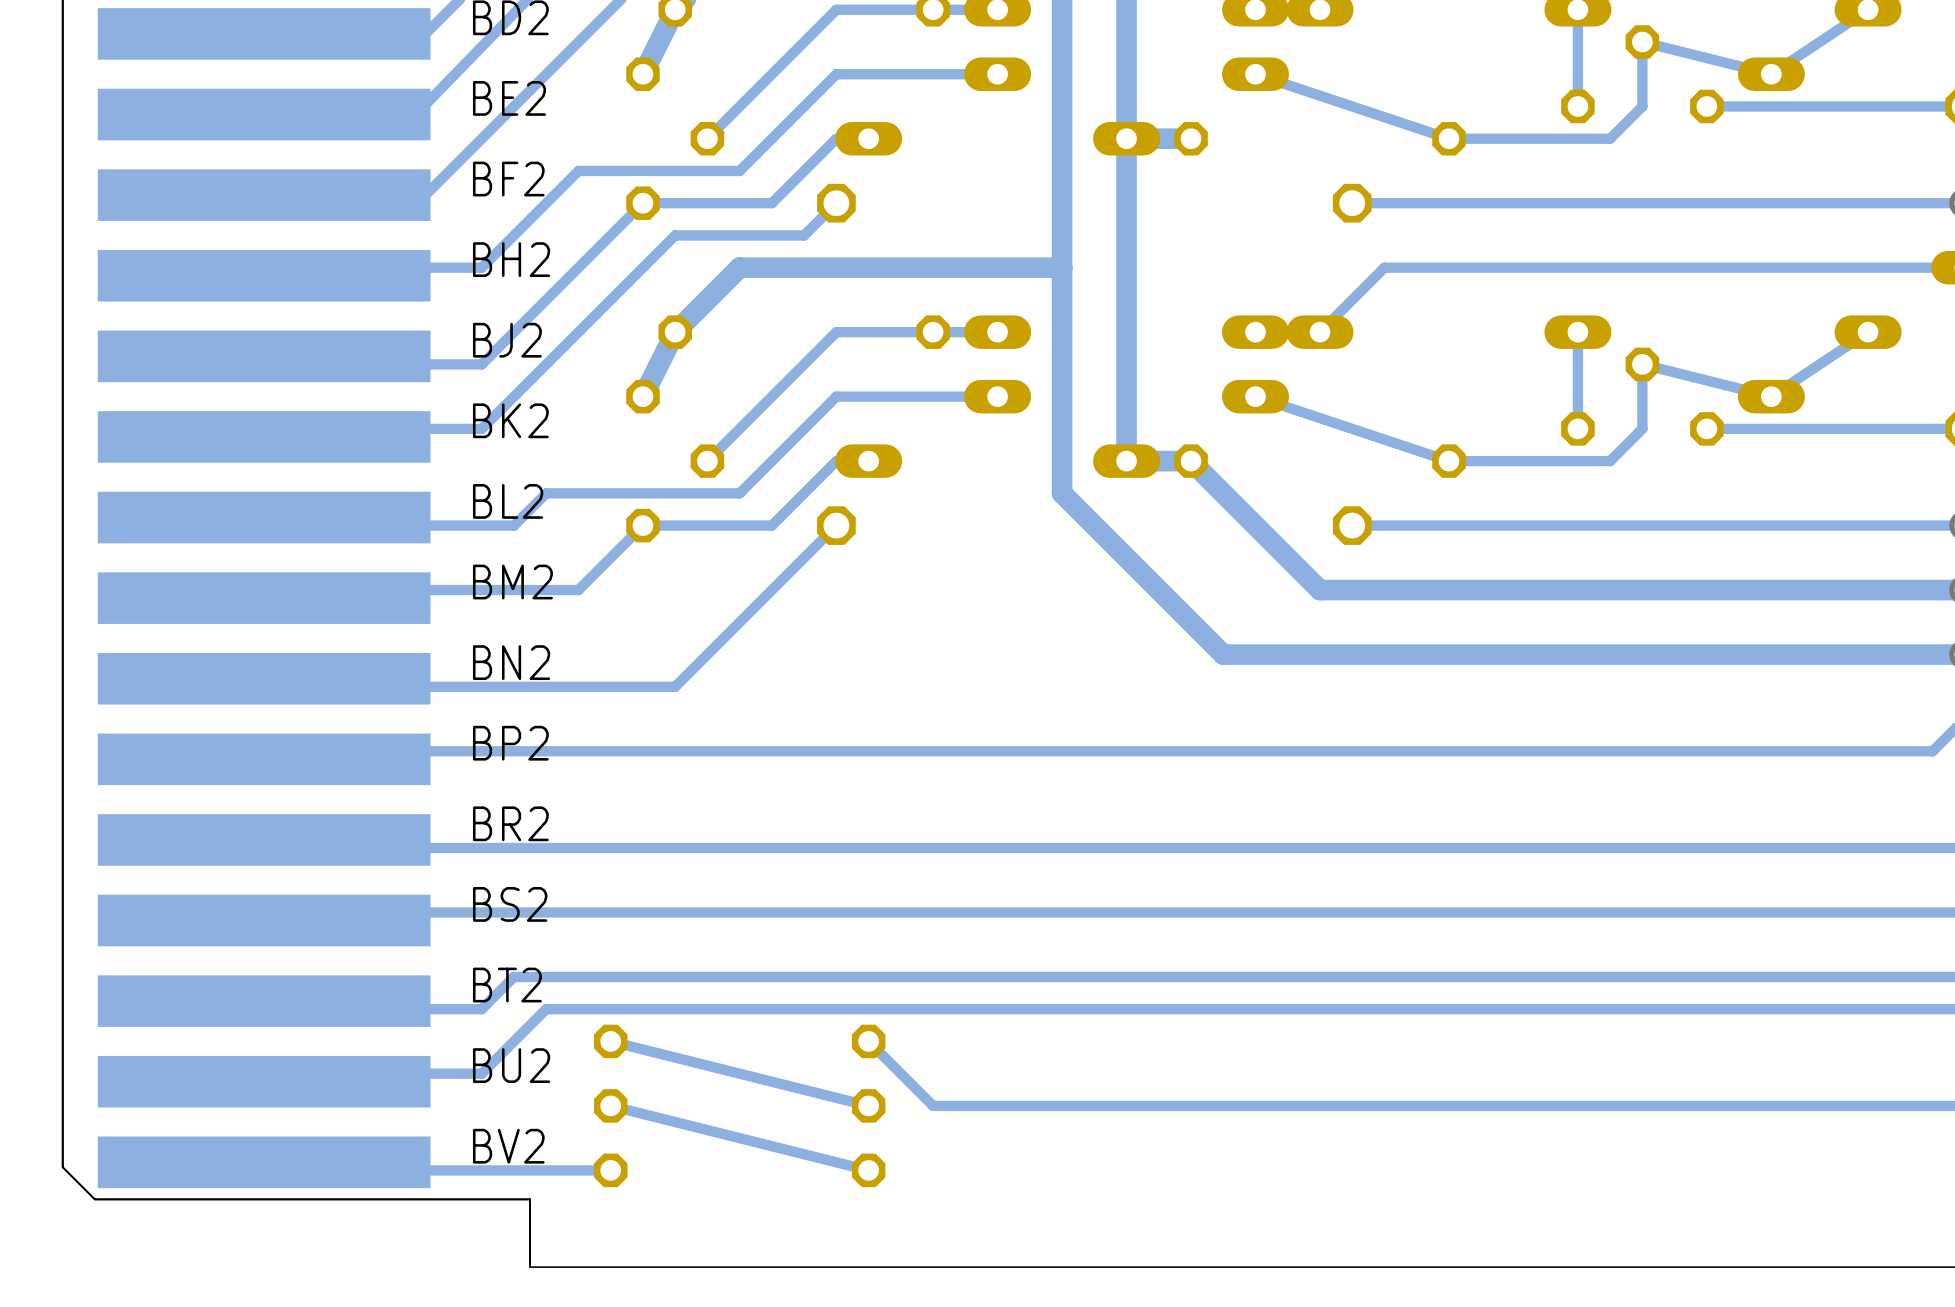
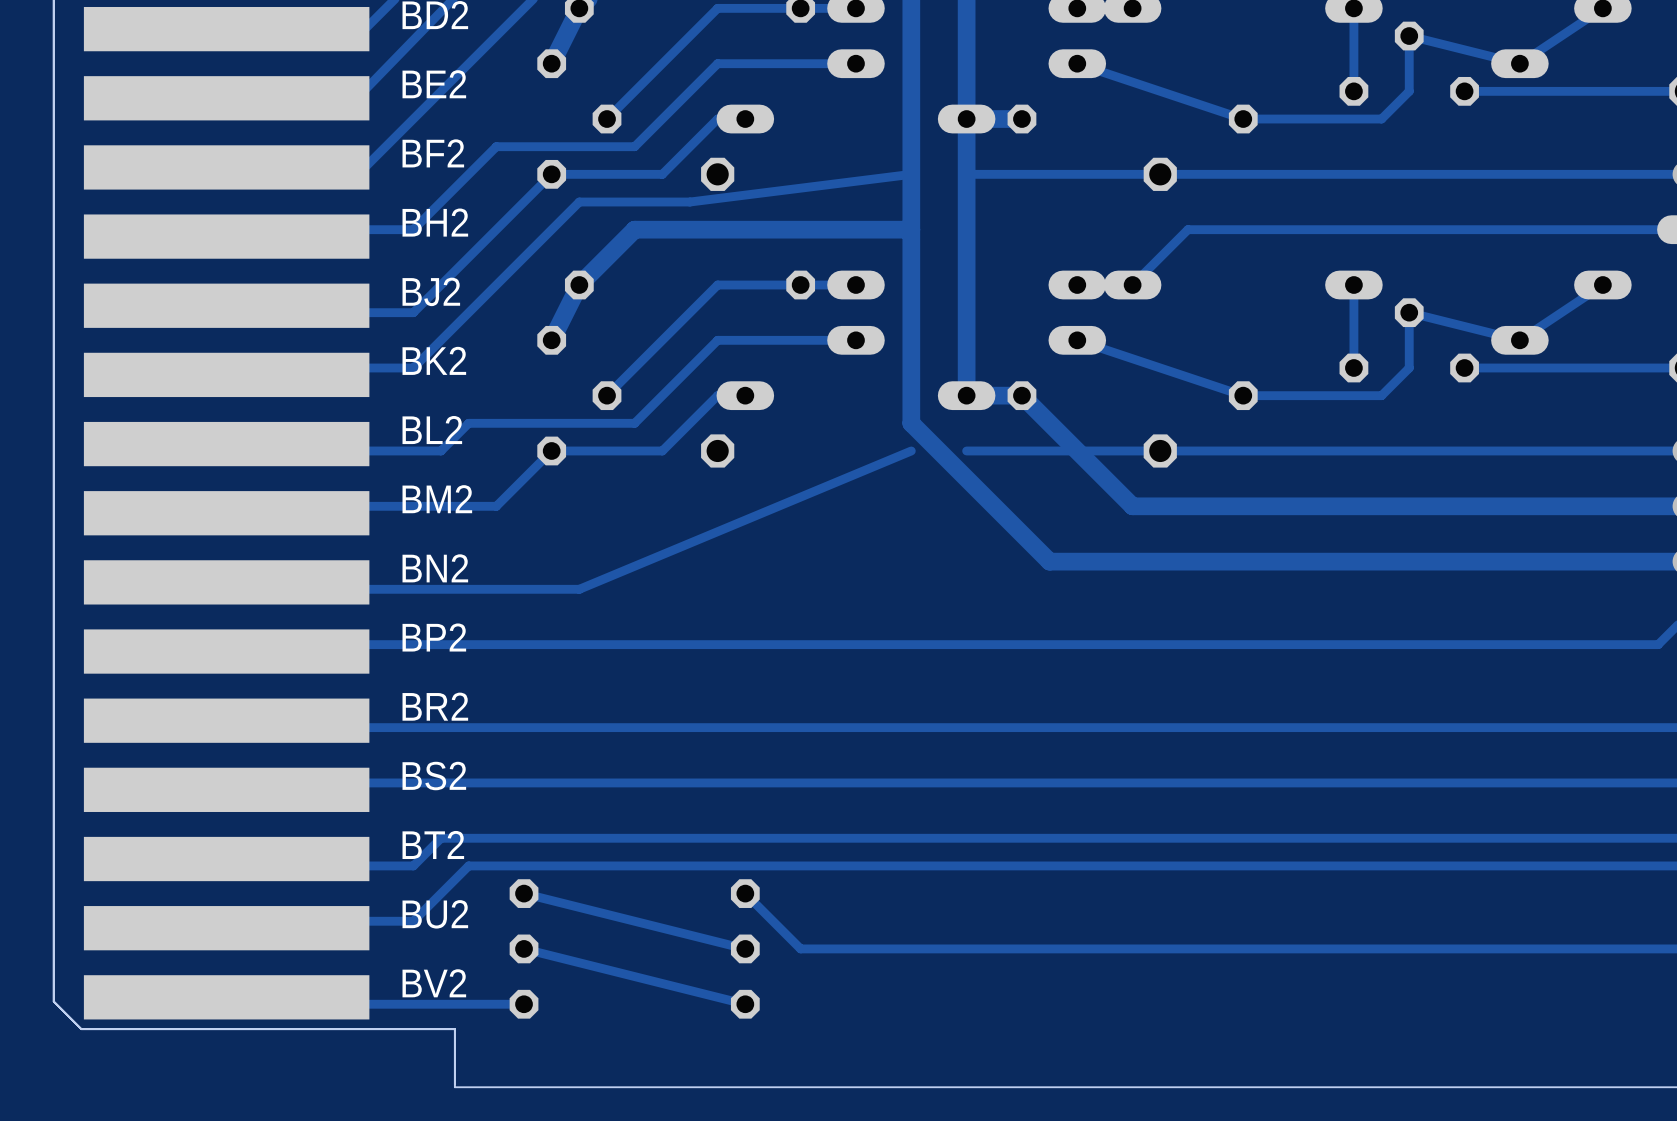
track: (836, 203) (804, 235) -> (911, 174) (690, 202)
track: none -> (1160, 174) (966, 174)
track: (836, 525) (675, 686) -> (911, 450) (579, 589)
track: none -> (1160, 450) (966, 450)

